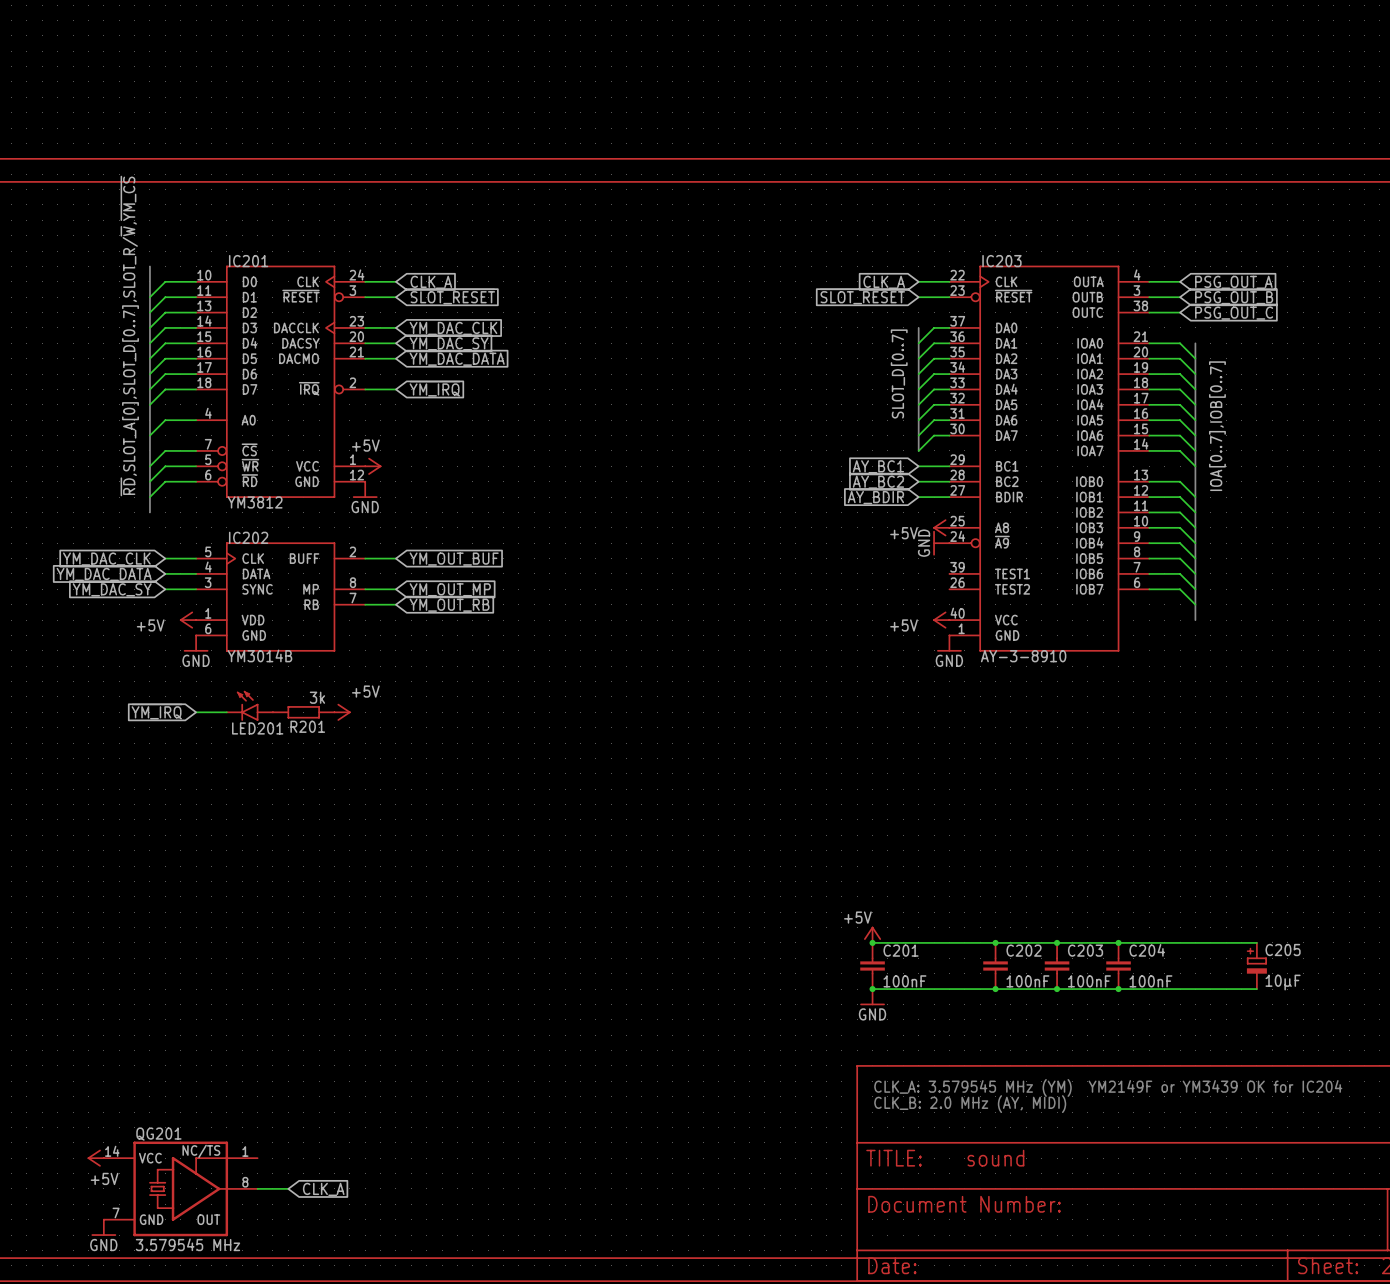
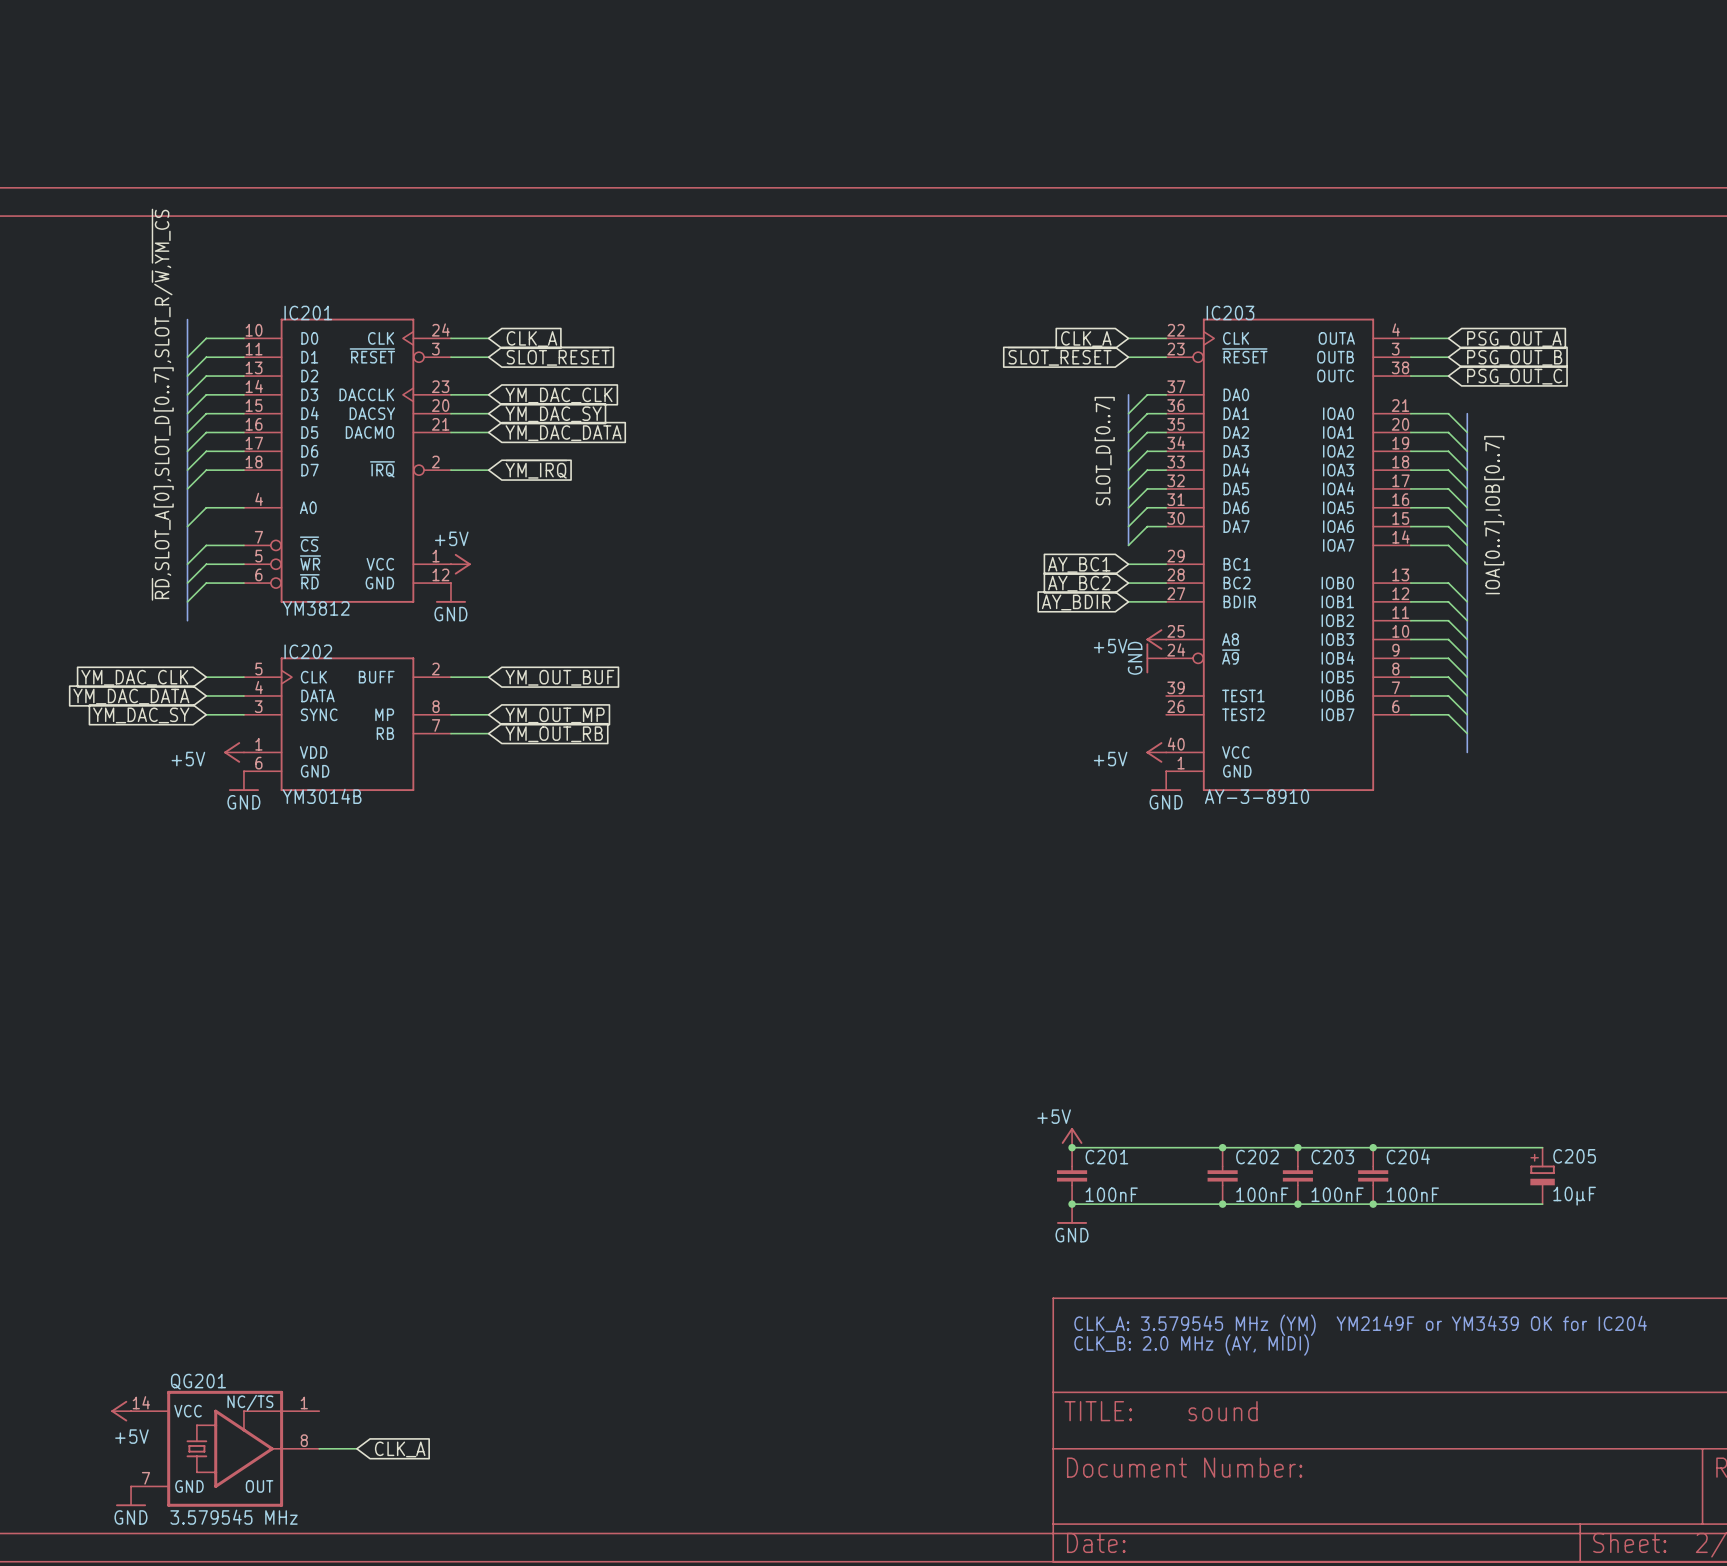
LED201: (249, 705) -> none
global label: ~{YM_IRQ} (156, 711) -> none
wire: (196, 712) (226, 712) -> none
R201: 3k (303, 712) -> none
power symbol: +5V (342, 712) -> none

